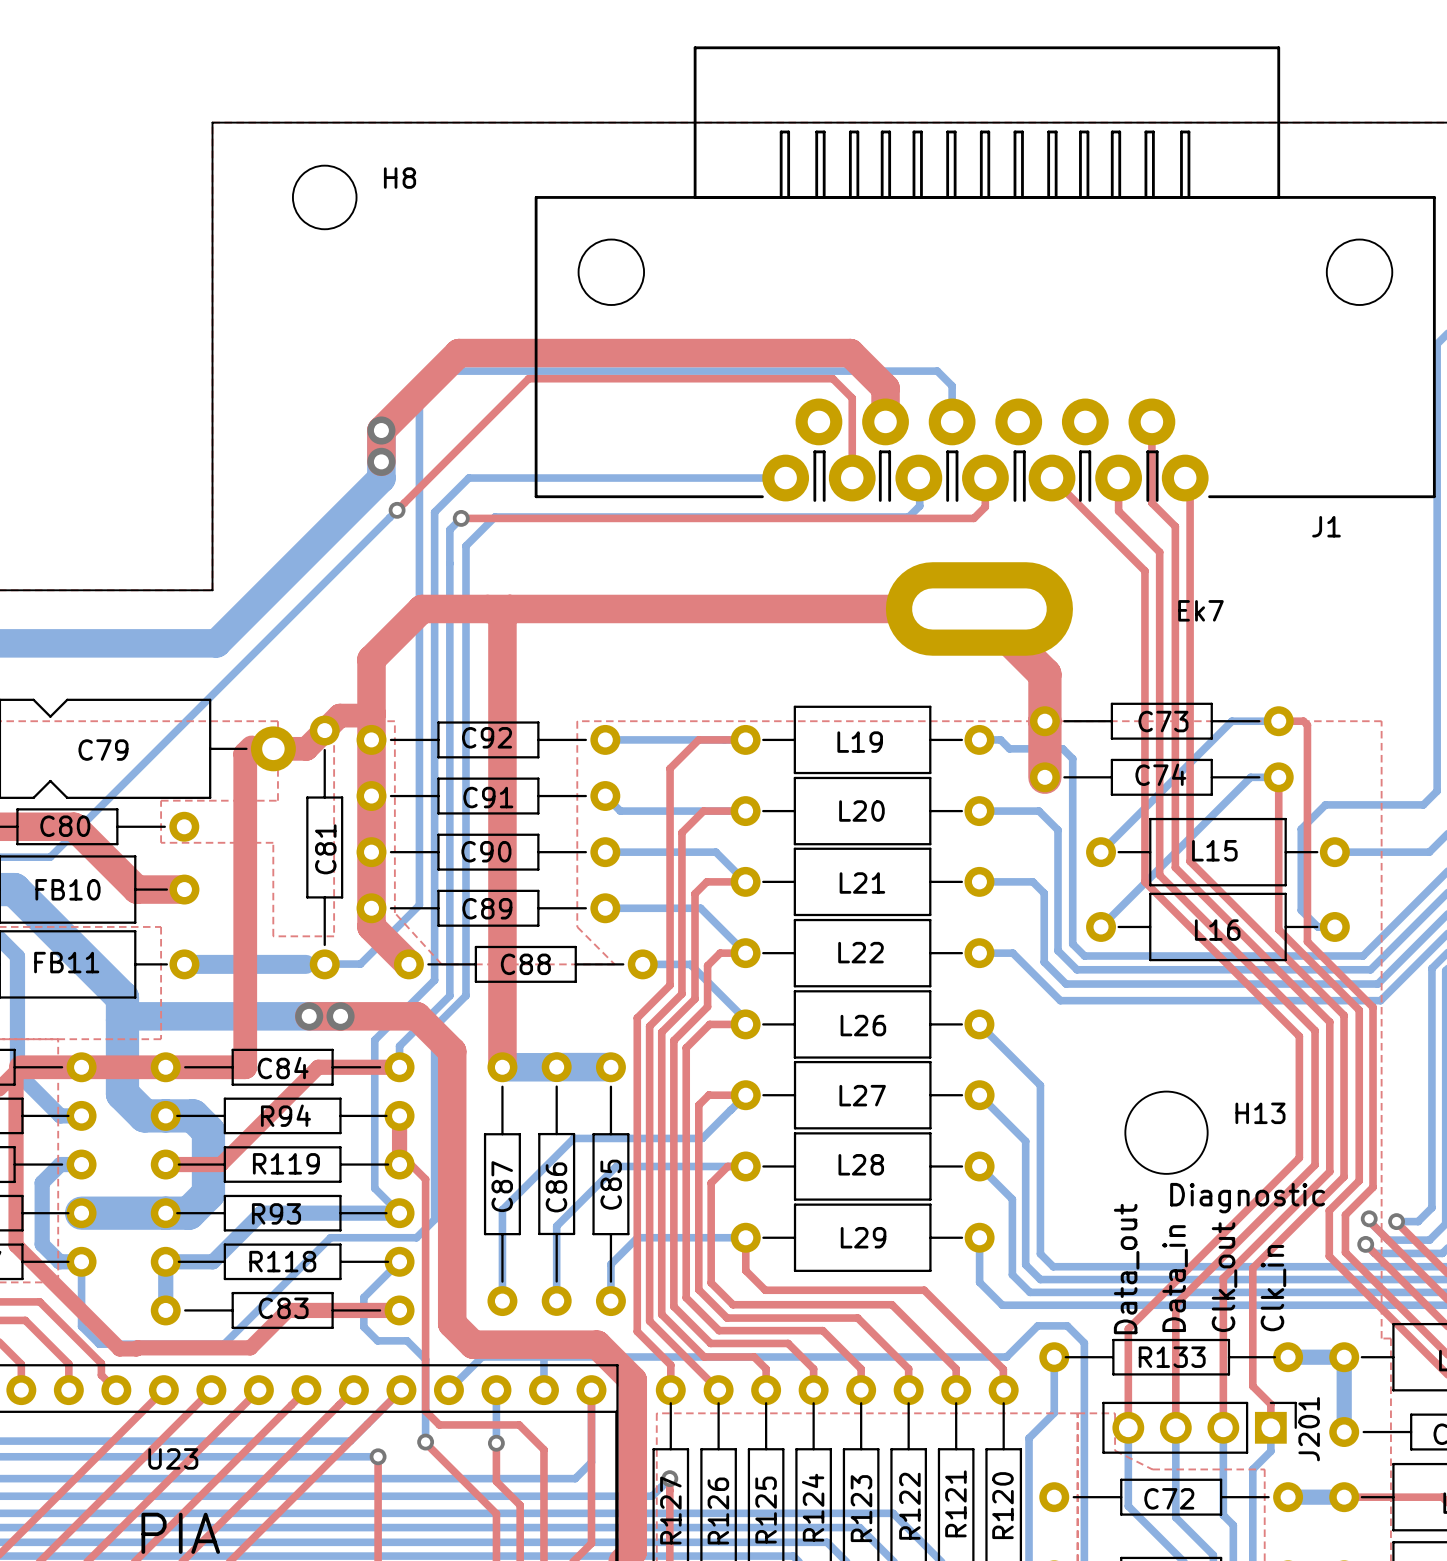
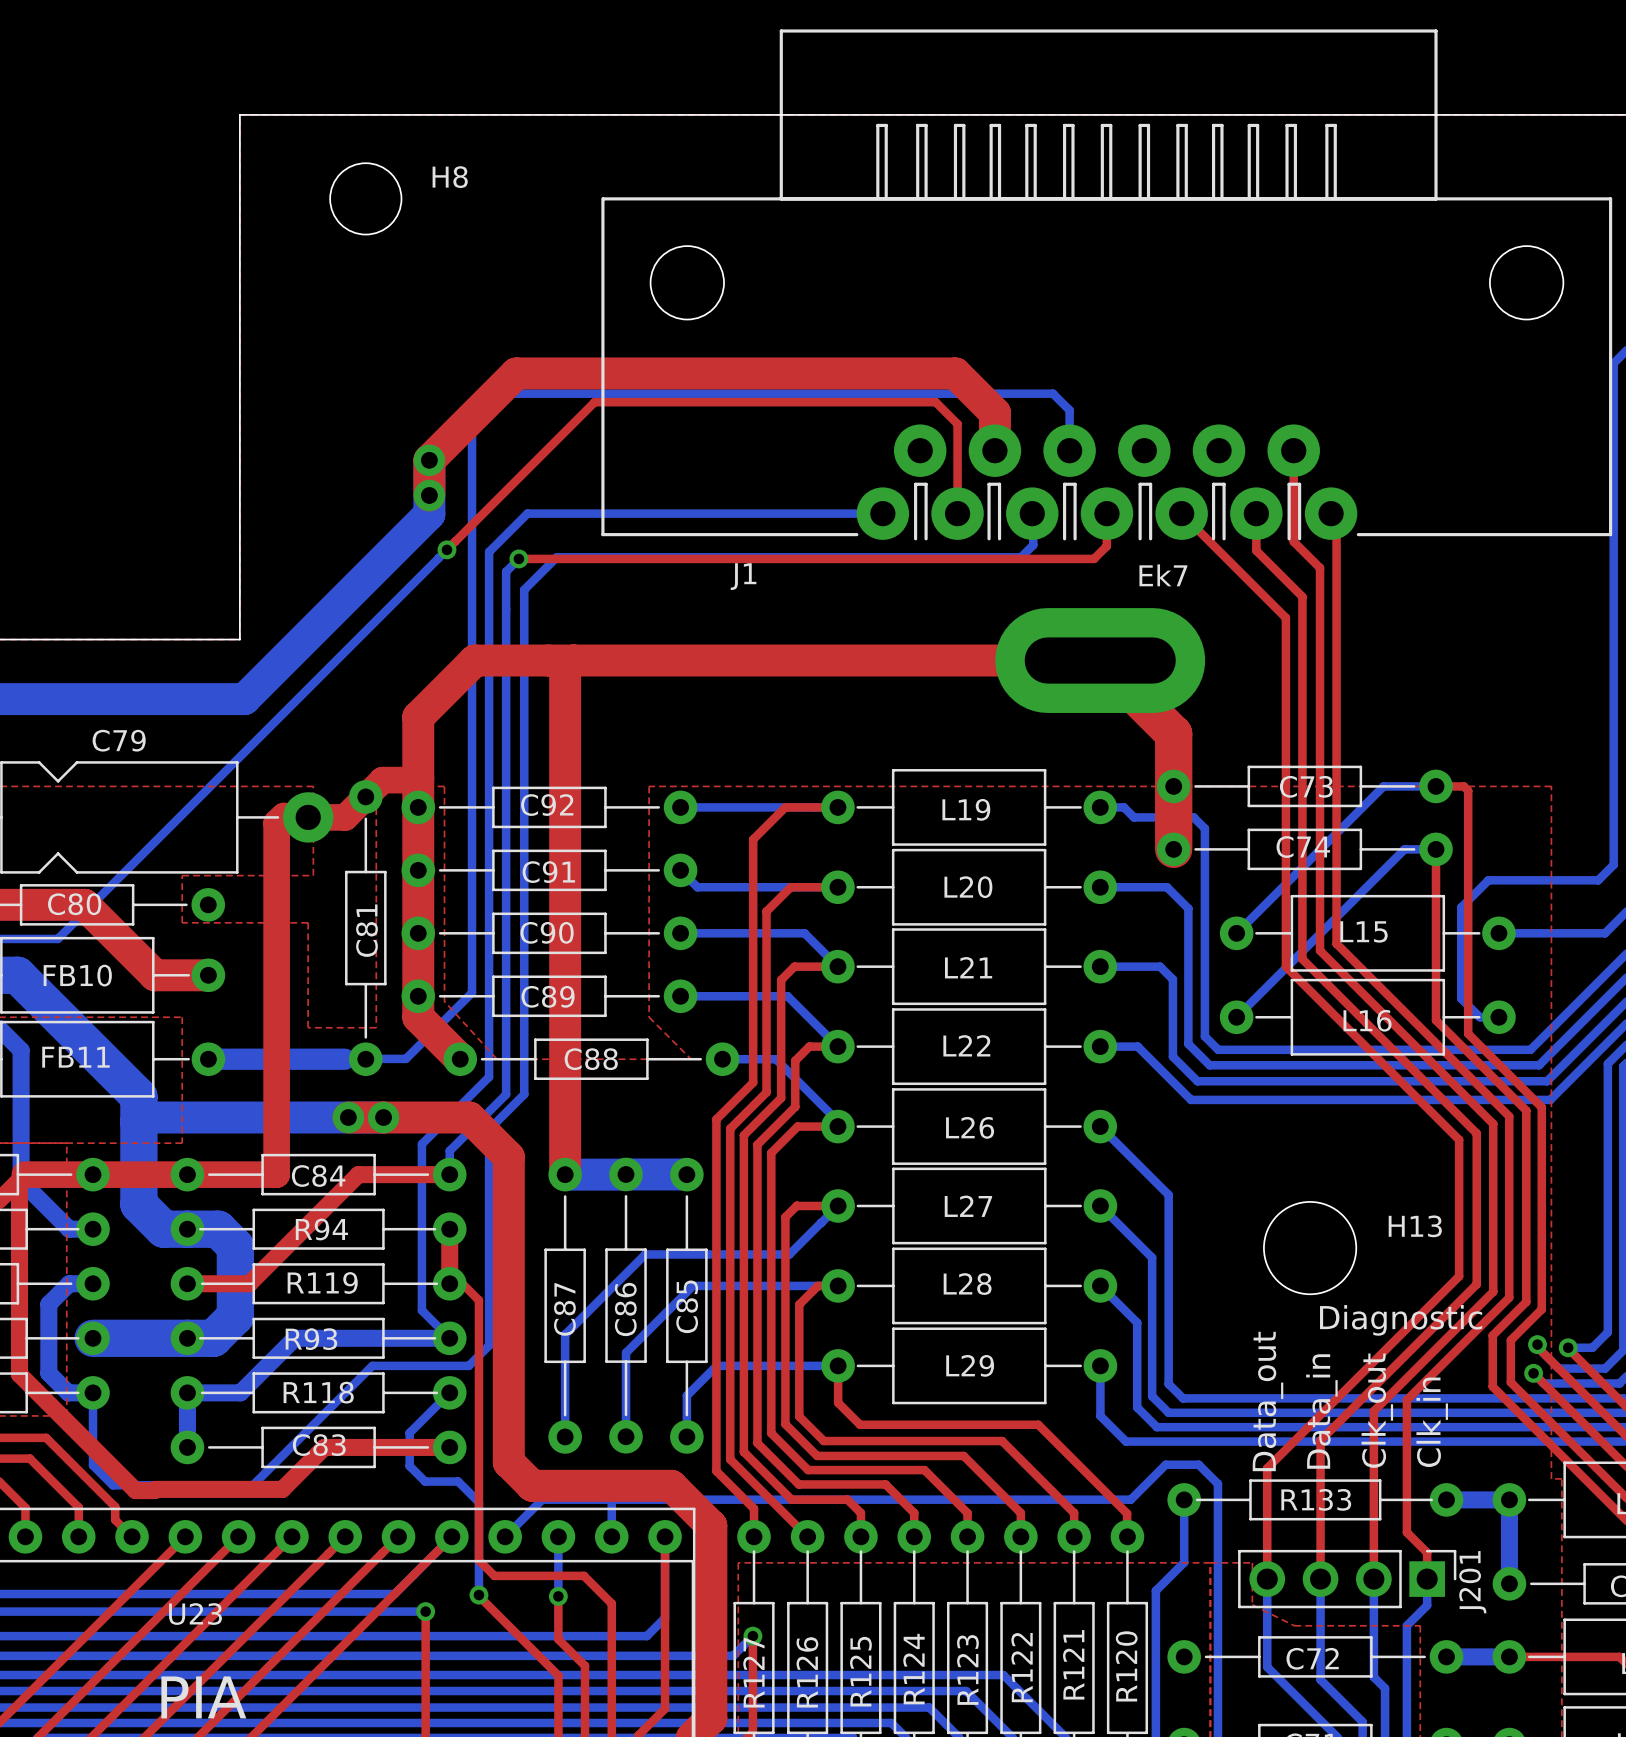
J1 name position: J1 (1326, 526) -> J1 (743, 576)
Ek7 name position: Ek7 (1200, 610) -> Ek7 (1163, 575)
C79 name position: C79 (103, 750) -> C79 (119, 740)

